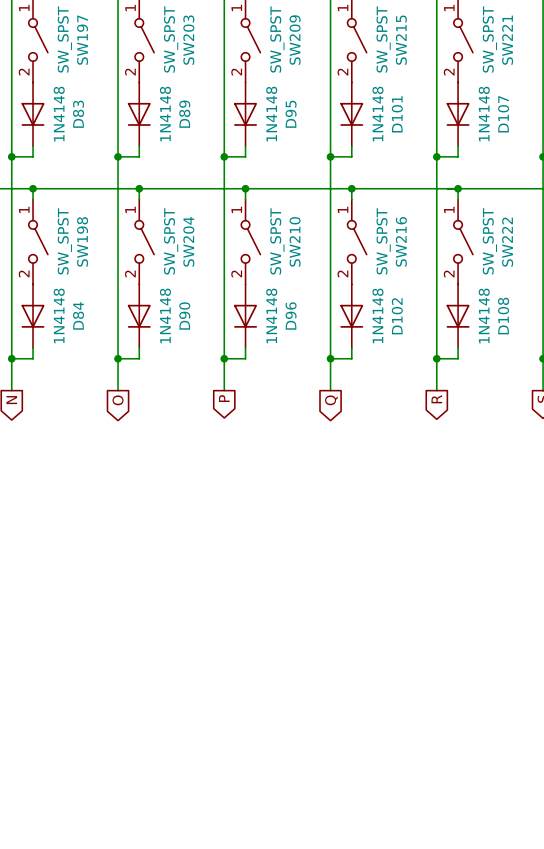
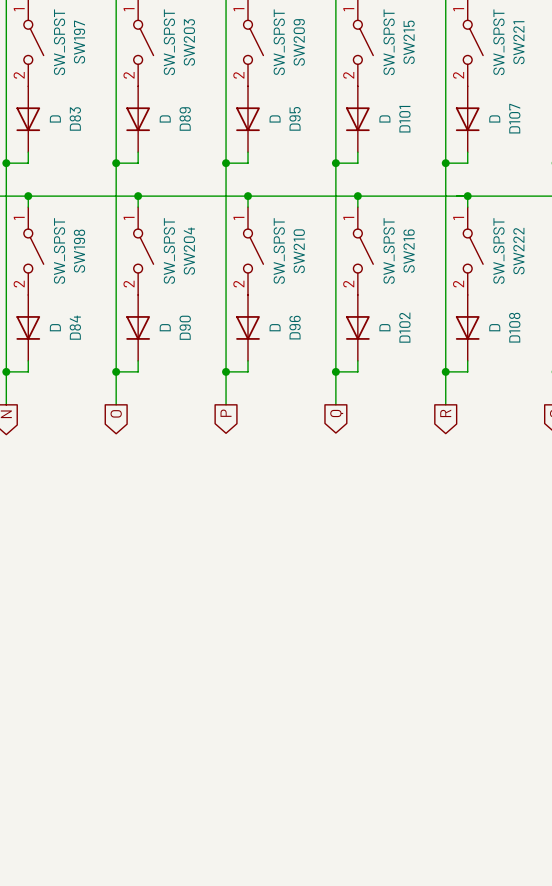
D83 value: 1N4148 (59, 114) -> D (55, 118)
D89 value: 1N4148 (165, 114) -> D (165, 118)
D95 value: 1N4148 (271, 114) -> D (275, 118)
D101 value: 1N4148 (377, 114) -> D (384, 118)
D107 value: 1N4148 (484, 114) -> D (494, 118)
D84 value: 1N4148 (59, 315) -> D (55, 327)
D90 value: 1N4148 (165, 315) -> D (165, 327)
D96 value: 1N4148 (271, 315) -> D (275, 327)
D102 value: 1N4148 (377, 315) -> D (384, 327)
D108 value: 1N4148 (484, 315) -> D (494, 327)

